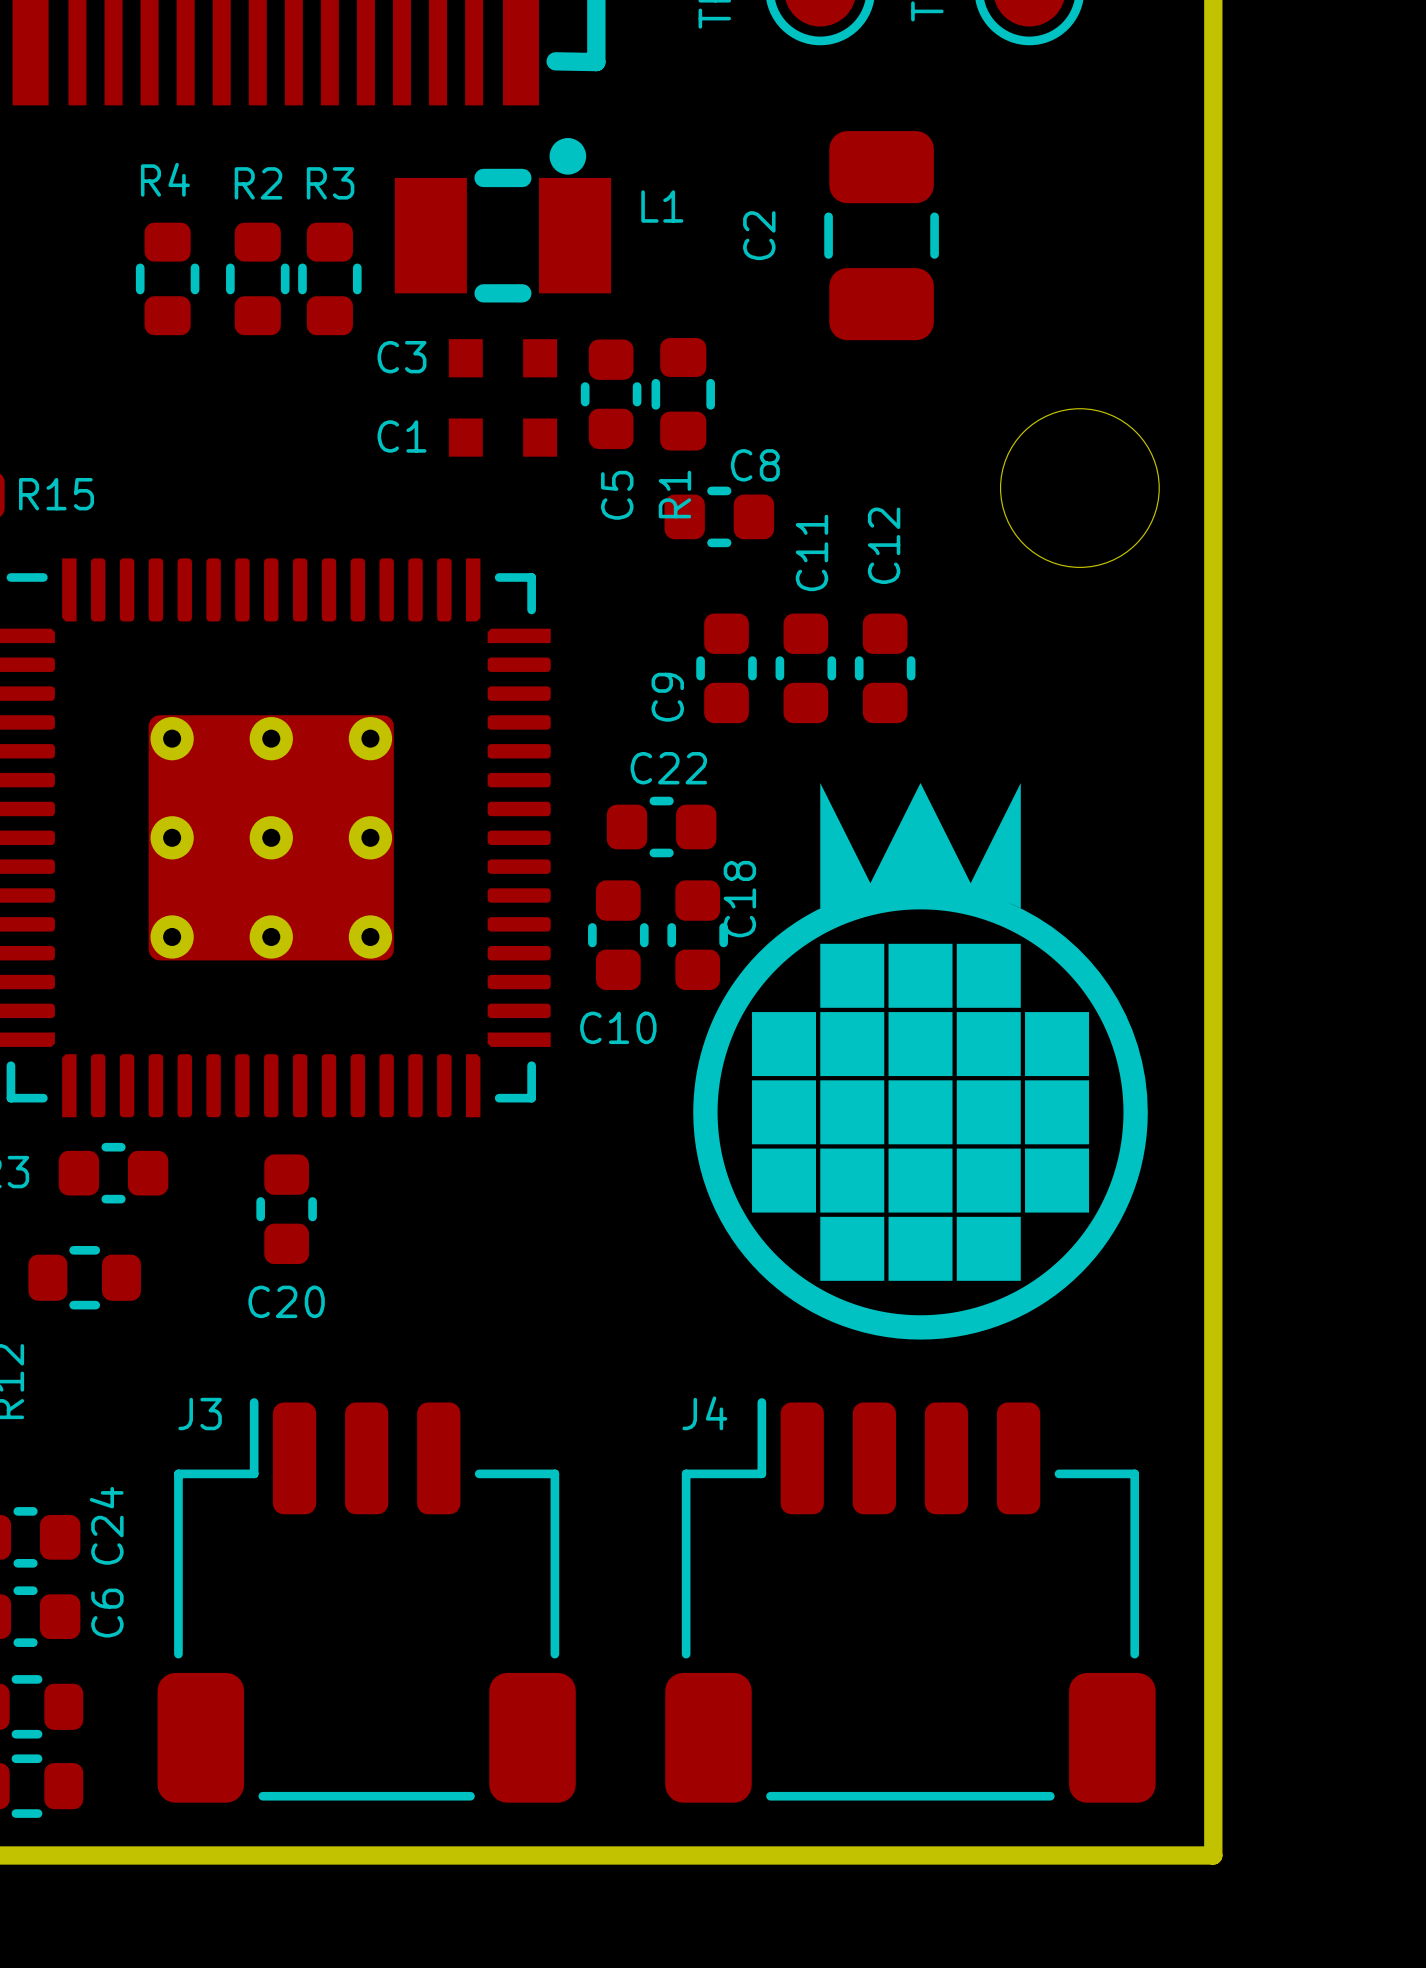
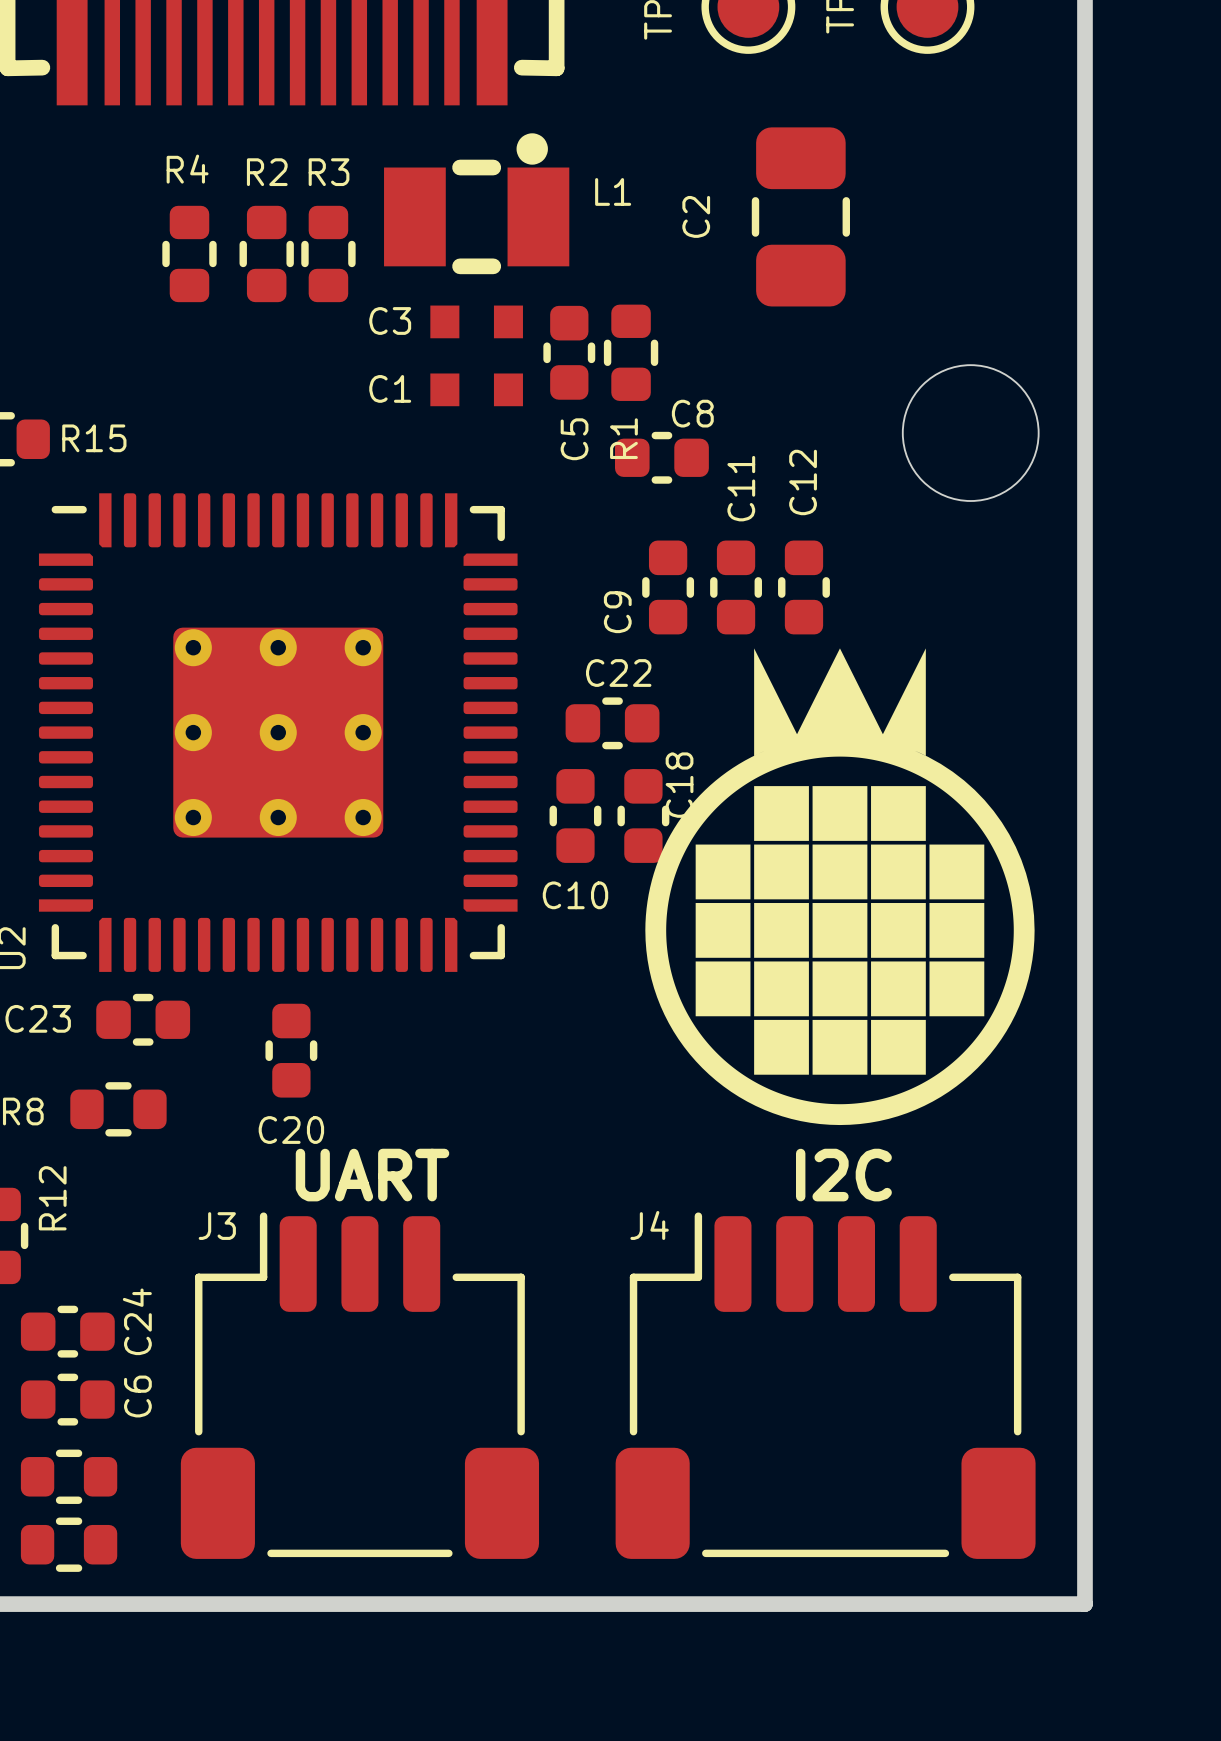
drawing: none -> [695, 786, 985, 1075]
drawing: [752, 943, 1090, 1281] -> none
drawing position: (920, 1061) -> (839, 886)
text: none -> UART (372, 1175)
text: none -> I2C (843, 1175)

